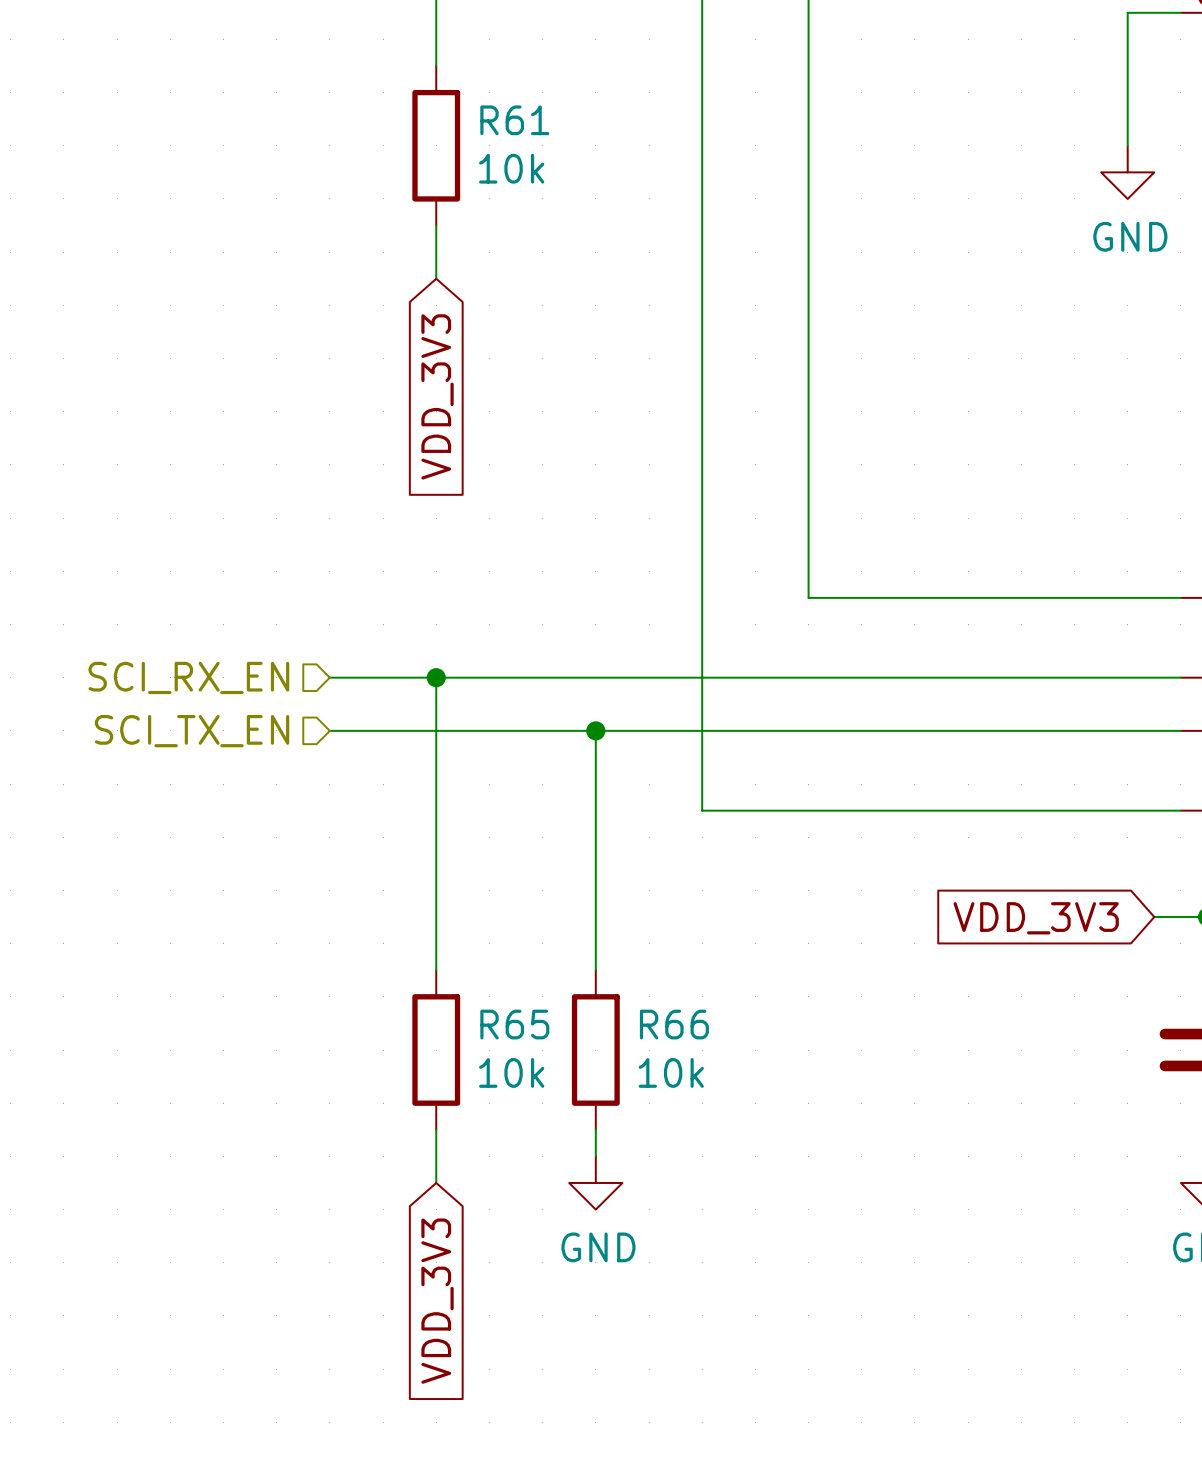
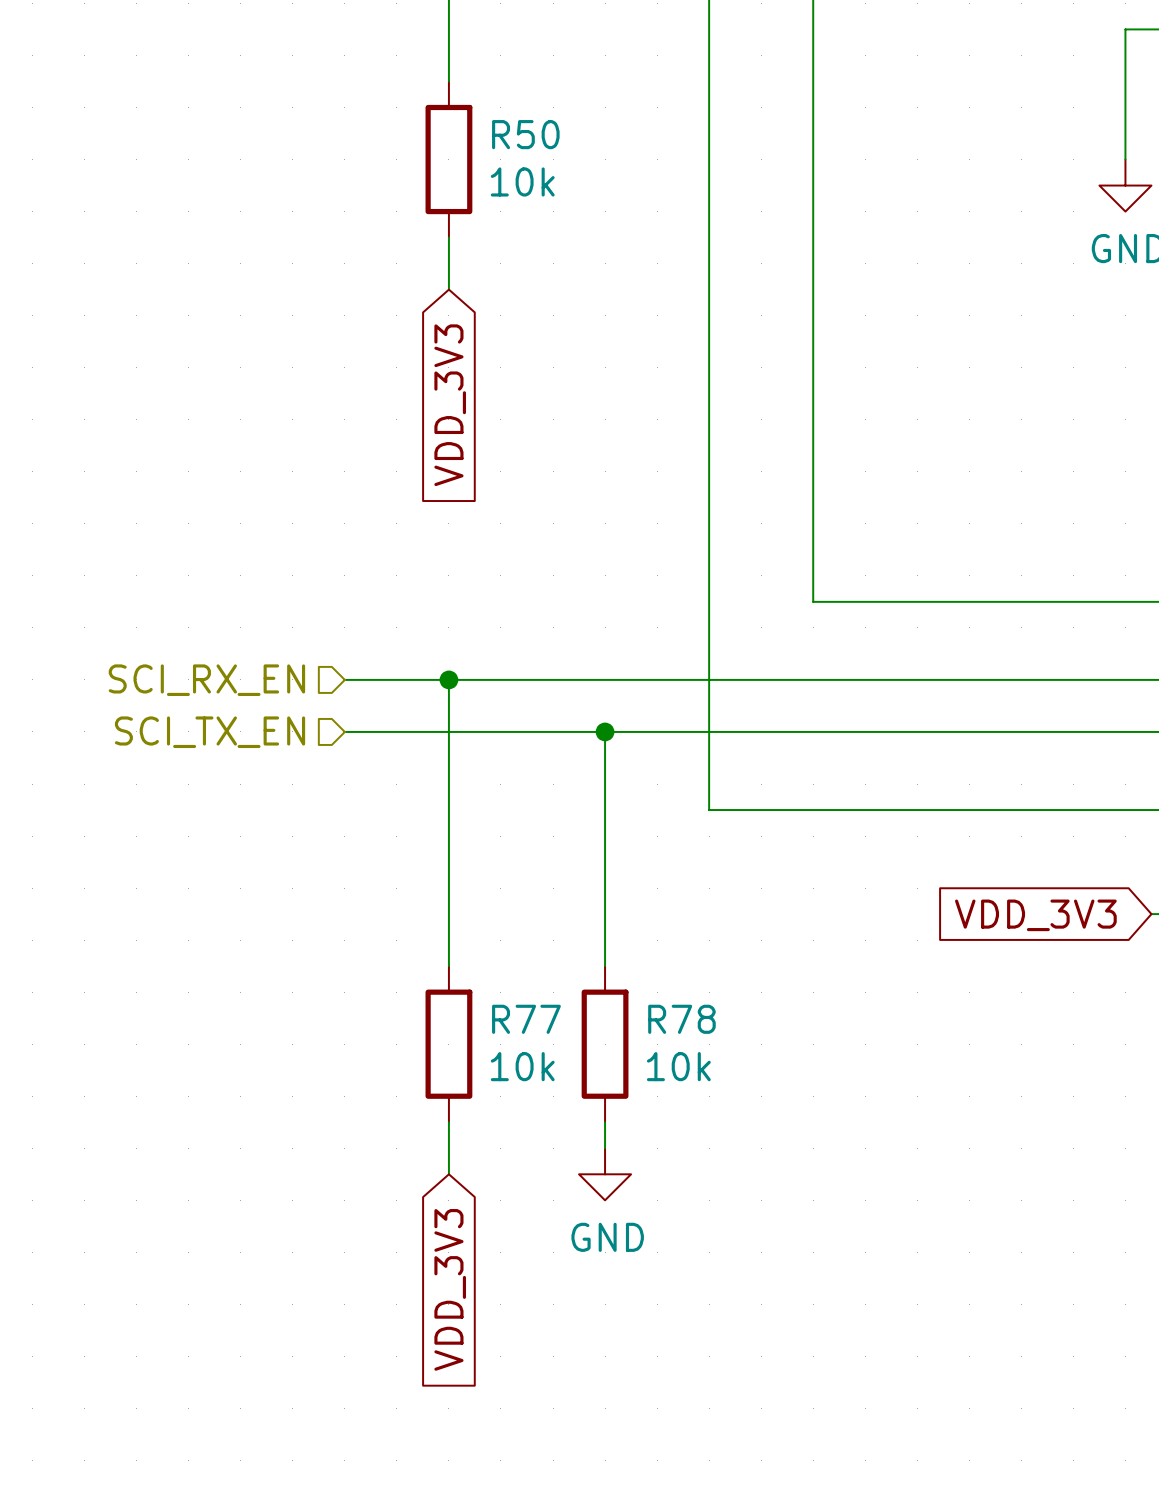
R61 name: R61 (514, 120) -> R50 (525, 134)
R65 name: R65 (514, 1024) -> R77 (526, 1019)
R66 name: R66 (674, 1024) -> R78 (681, 1019)

